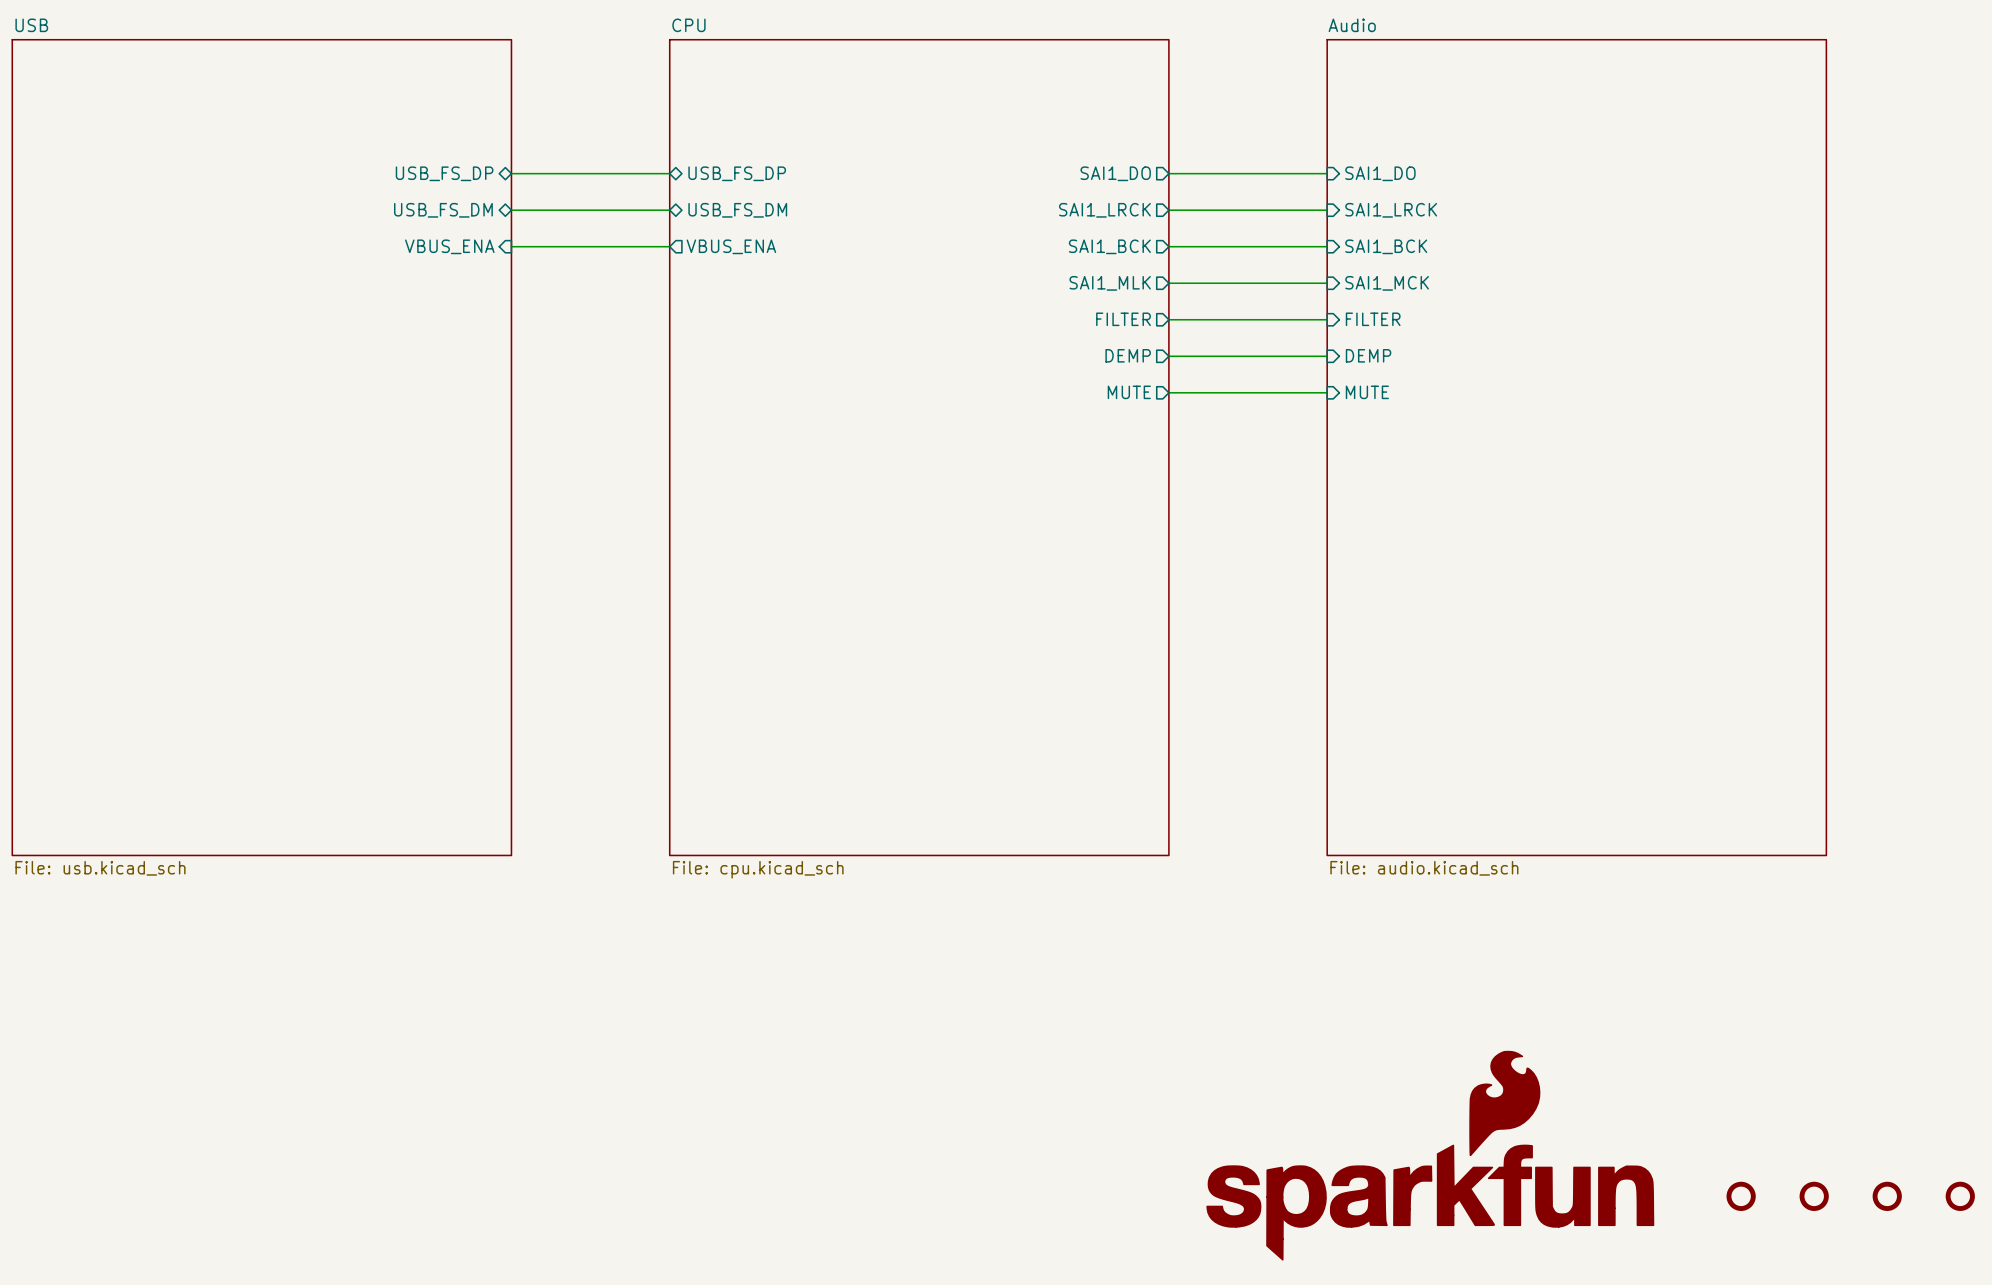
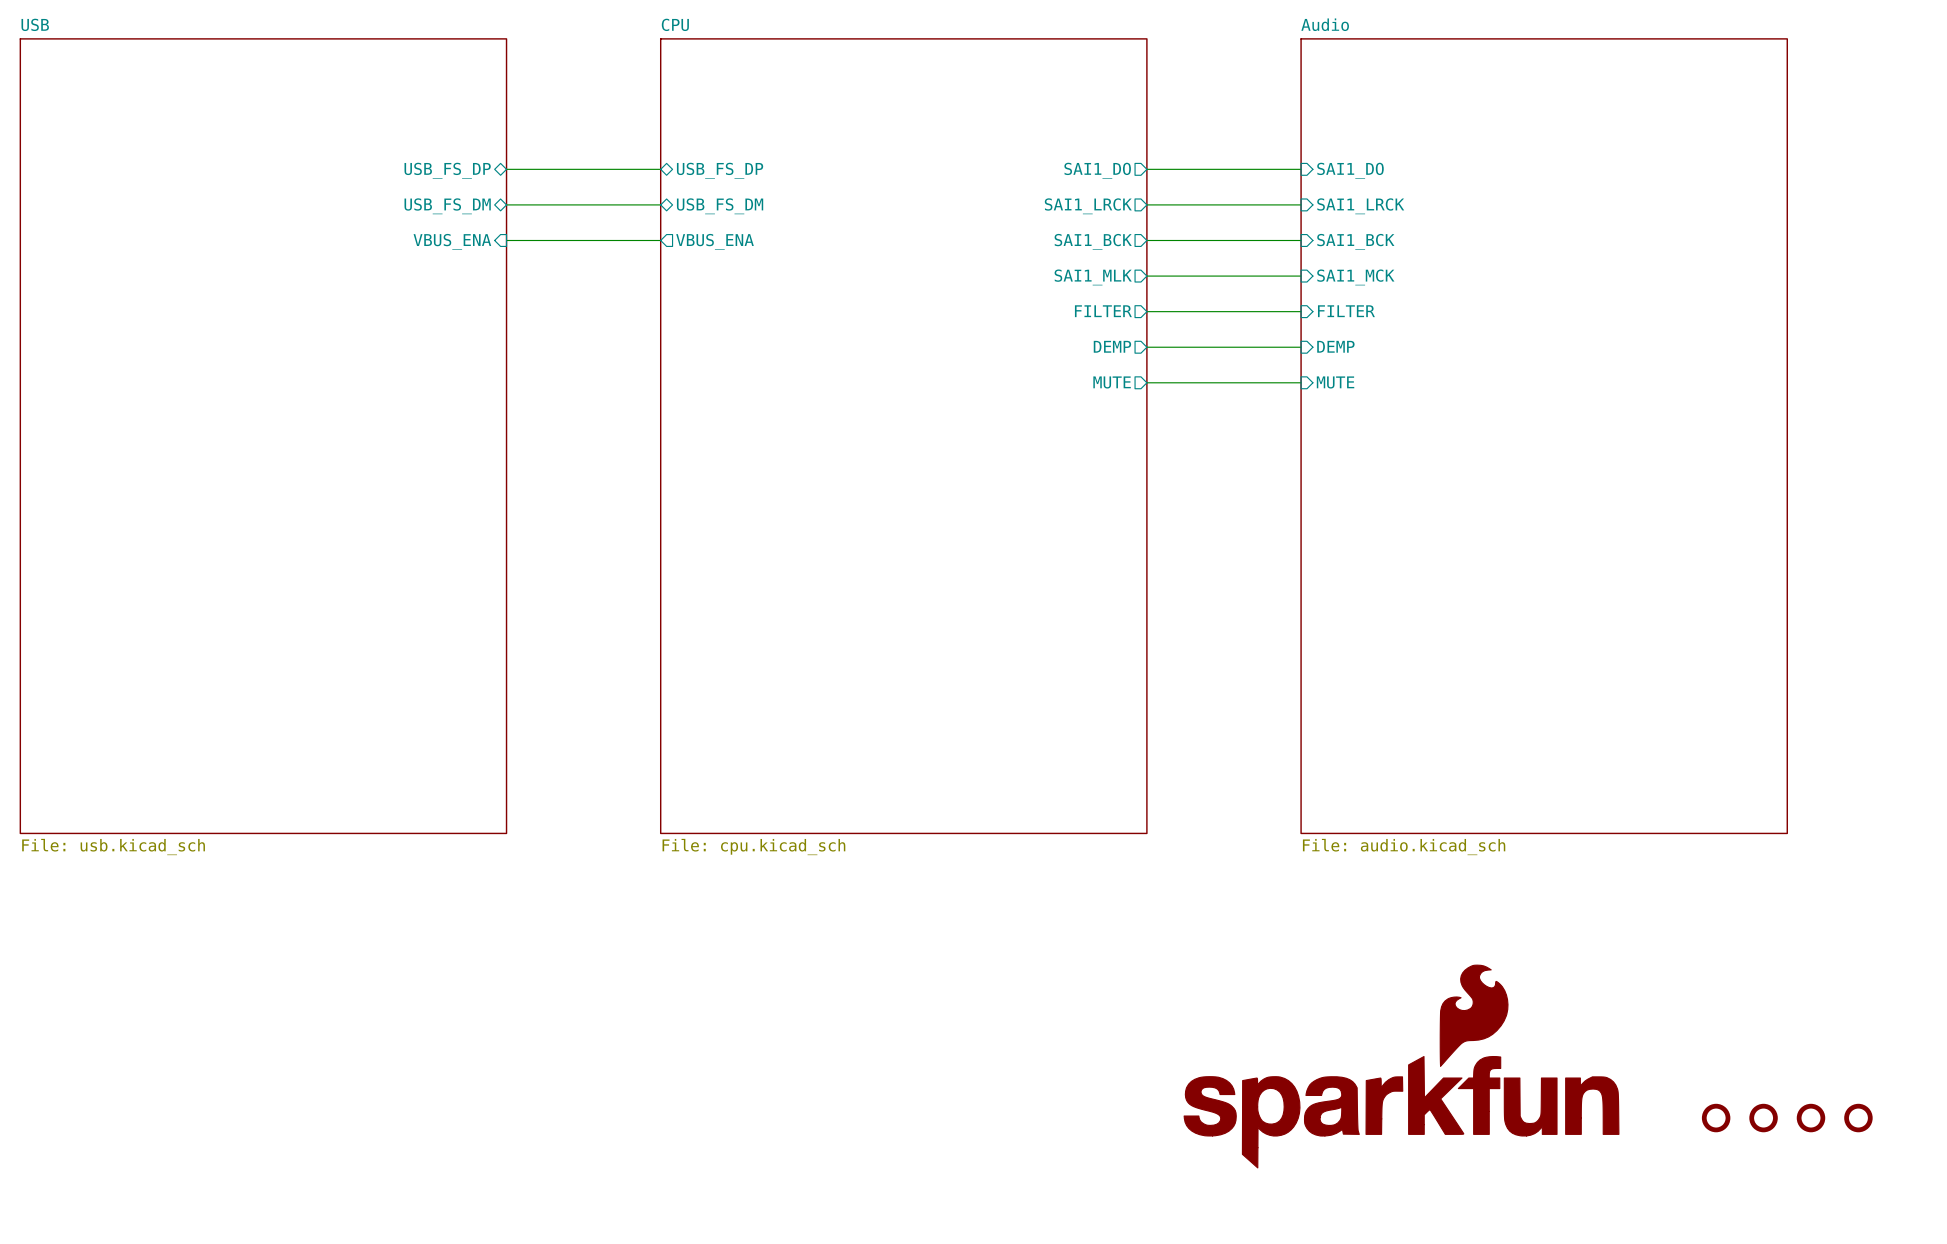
part: none -> (1716, 1118)
part: none -> (1763, 1118)
part: none -> (1810, 1118)
part: none -> (1858, 1118)
part position: (1430, 1155) -> (1401, 1066)
part: (1741, 1196) -> none
part: (1814, 1196) -> none
part: (1887, 1196) -> none
part: (1960, 1196) -> none

